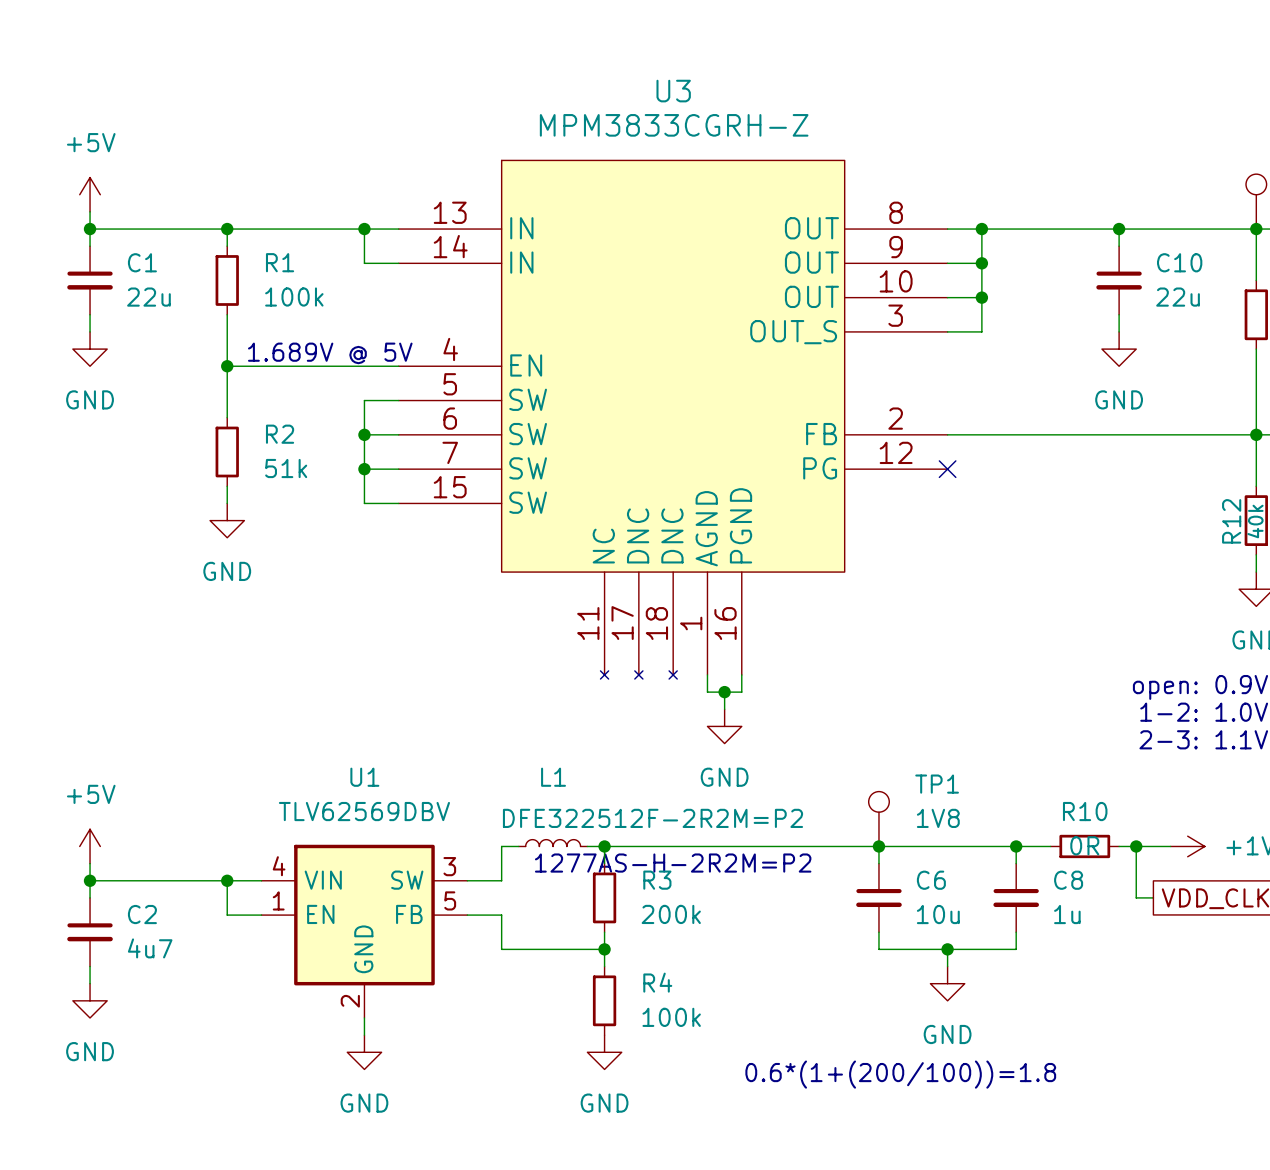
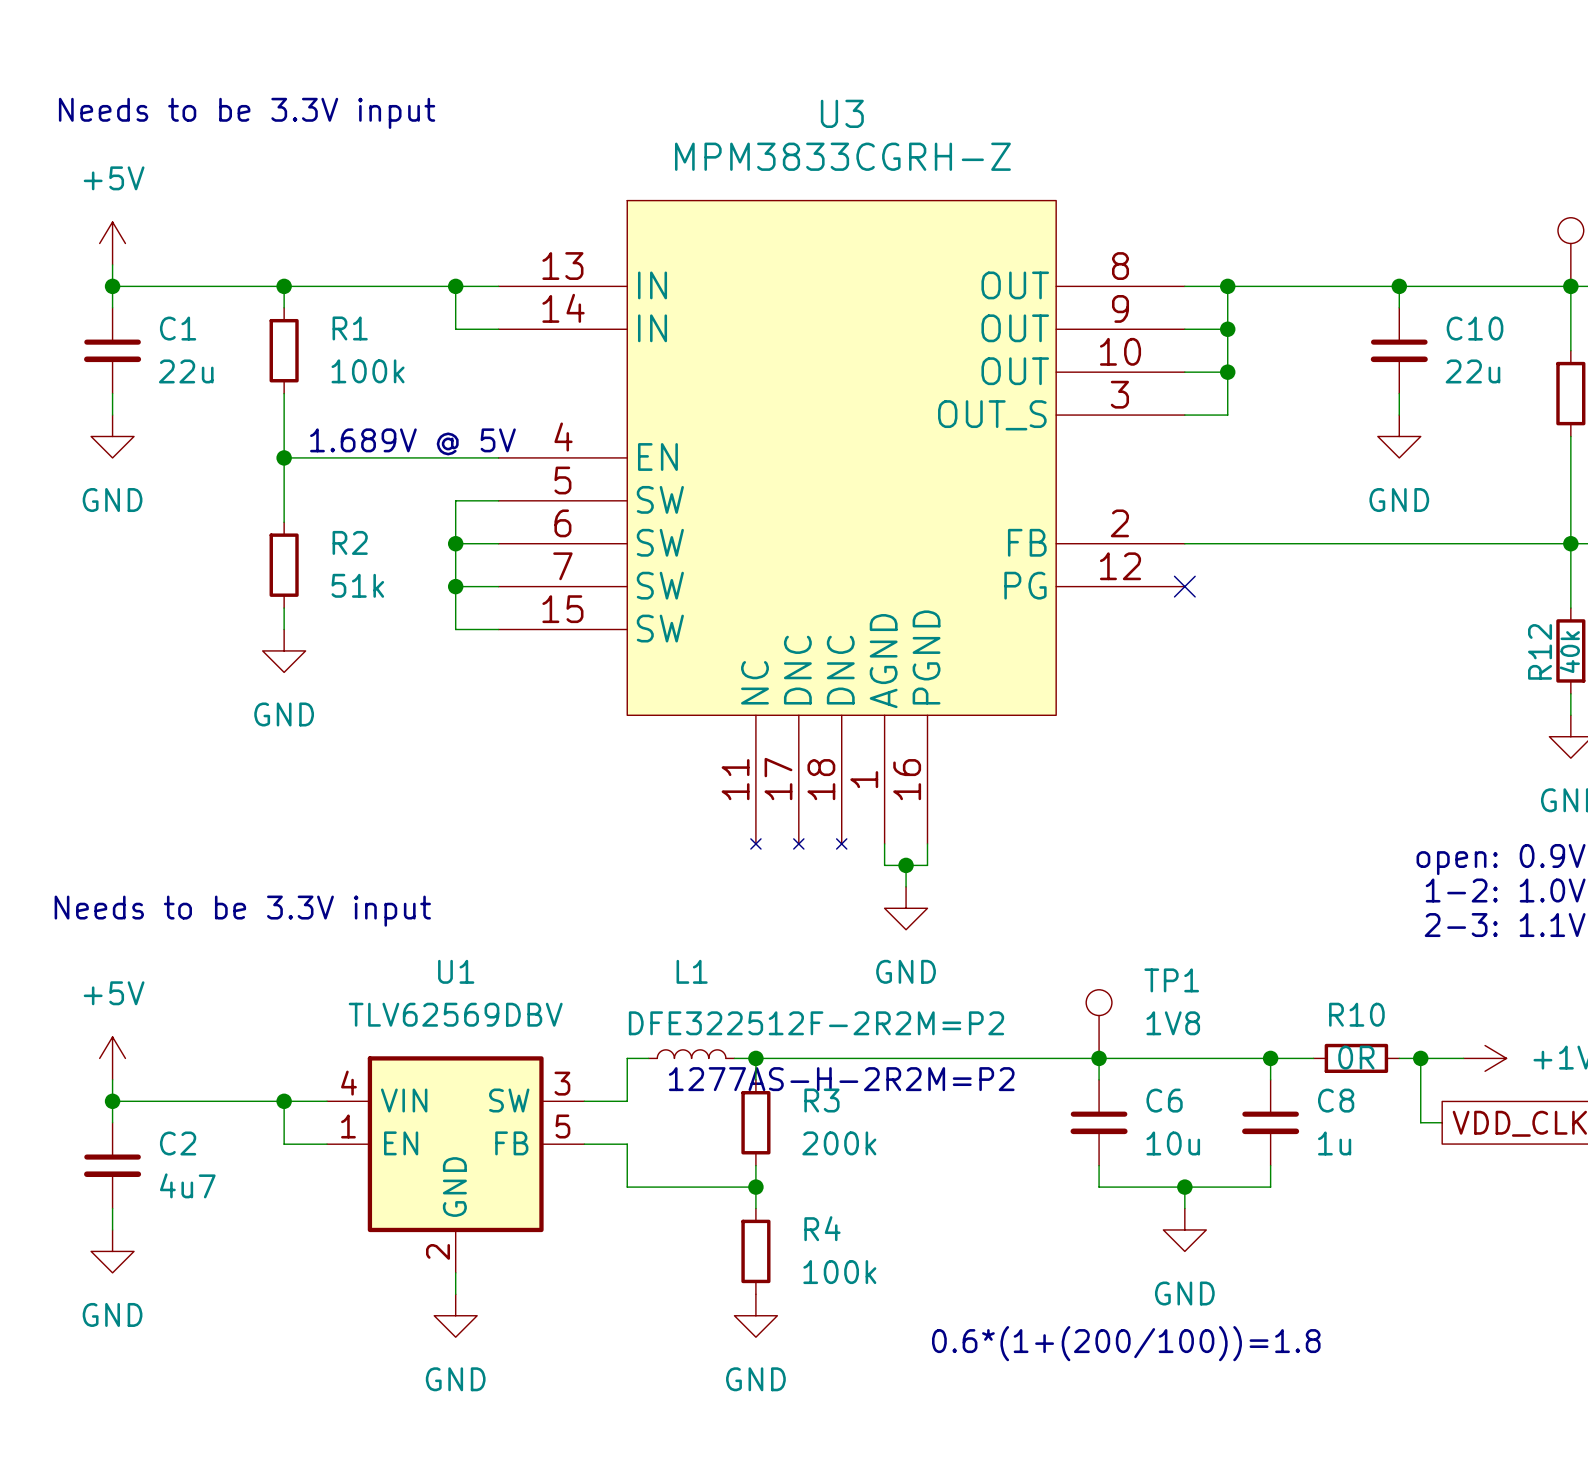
text: none -> Needs to be 3.3V input (247, 113)
text: none -> Needs to be 3.3V input (242, 911)

